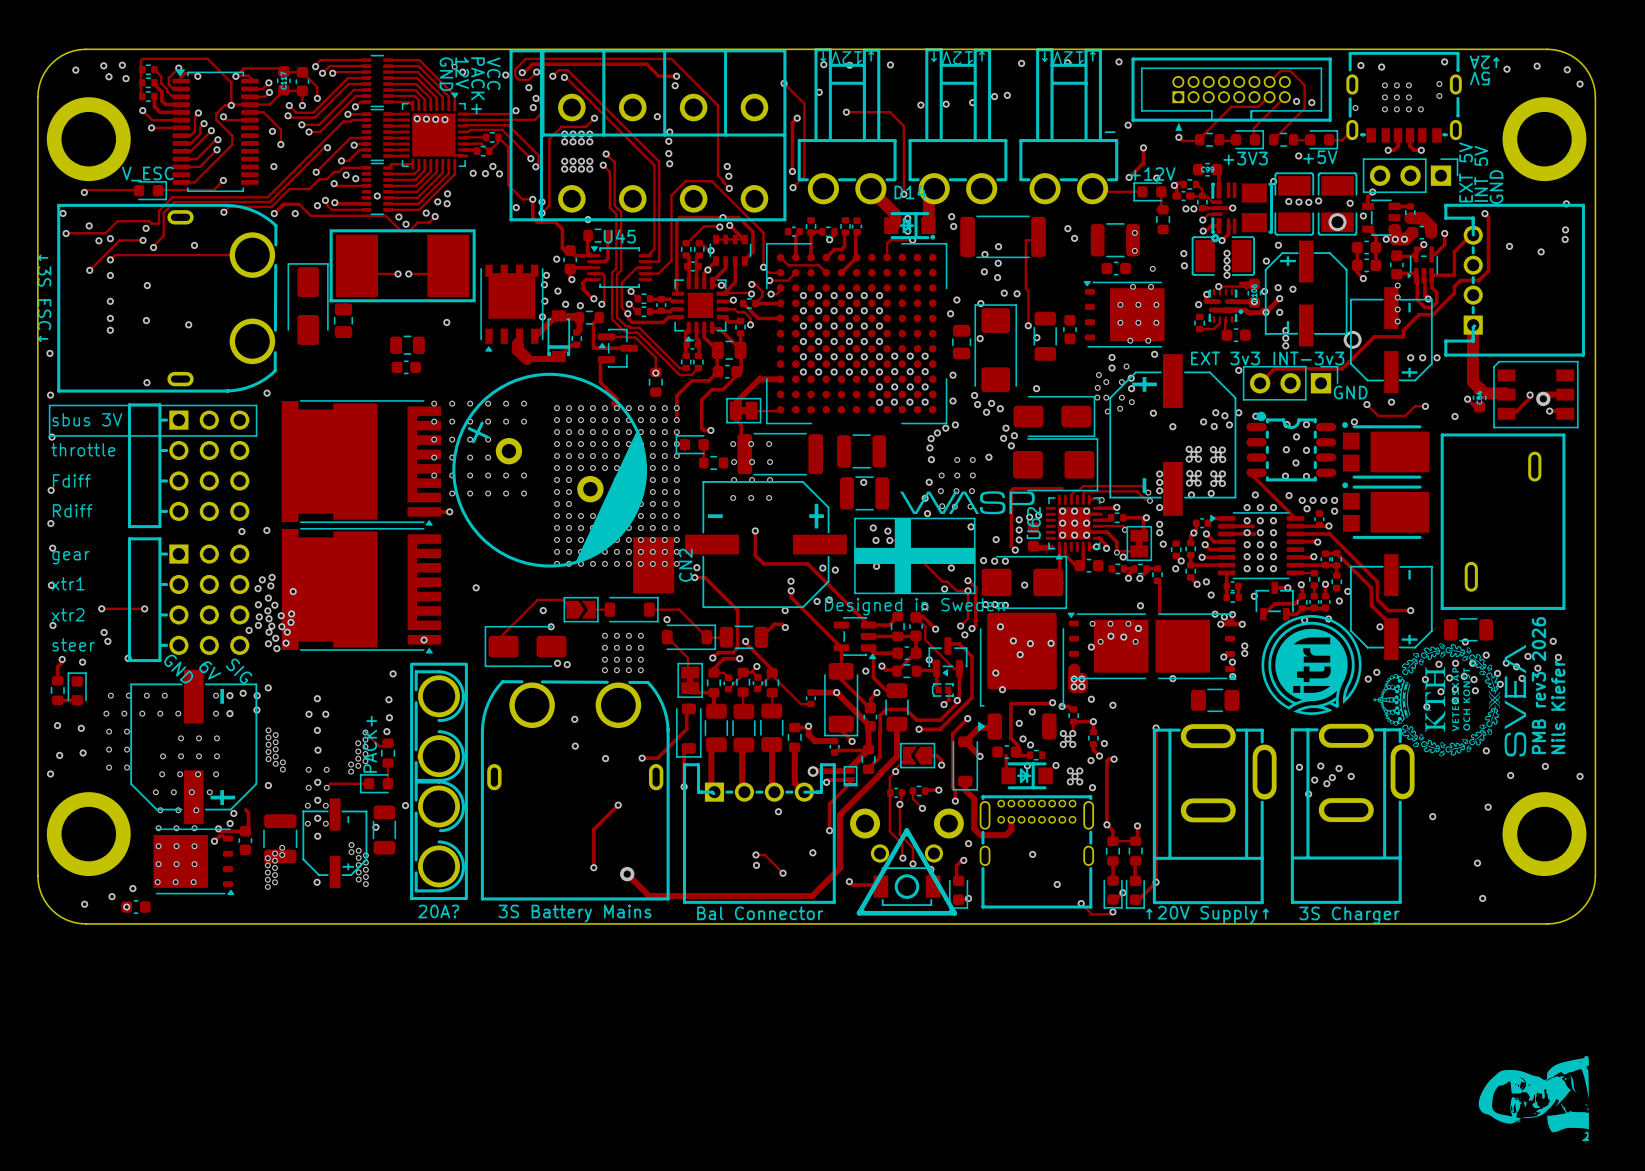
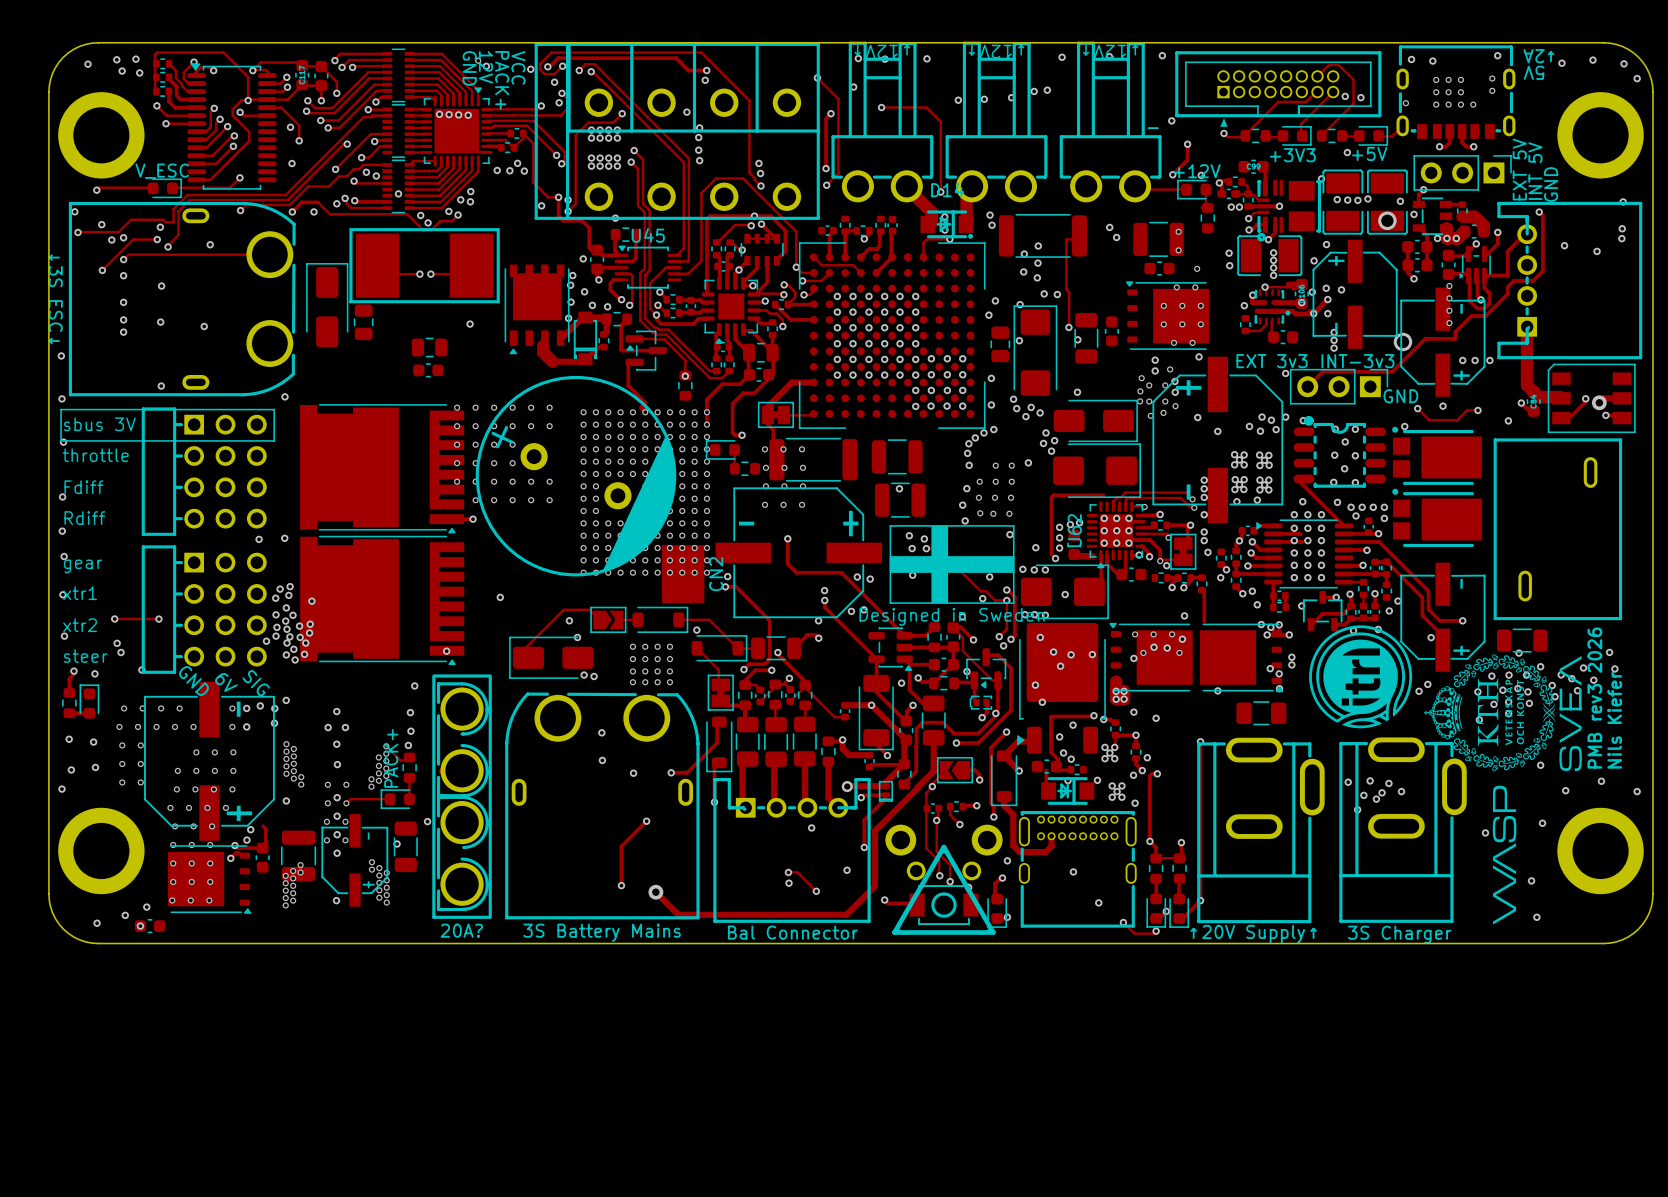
drawing: [900, 491, 1035, 515] -> none
drawing: none -> [1492, 785, 1517, 925]
drawing: [1478, 1056, 1589, 1142] -> none

